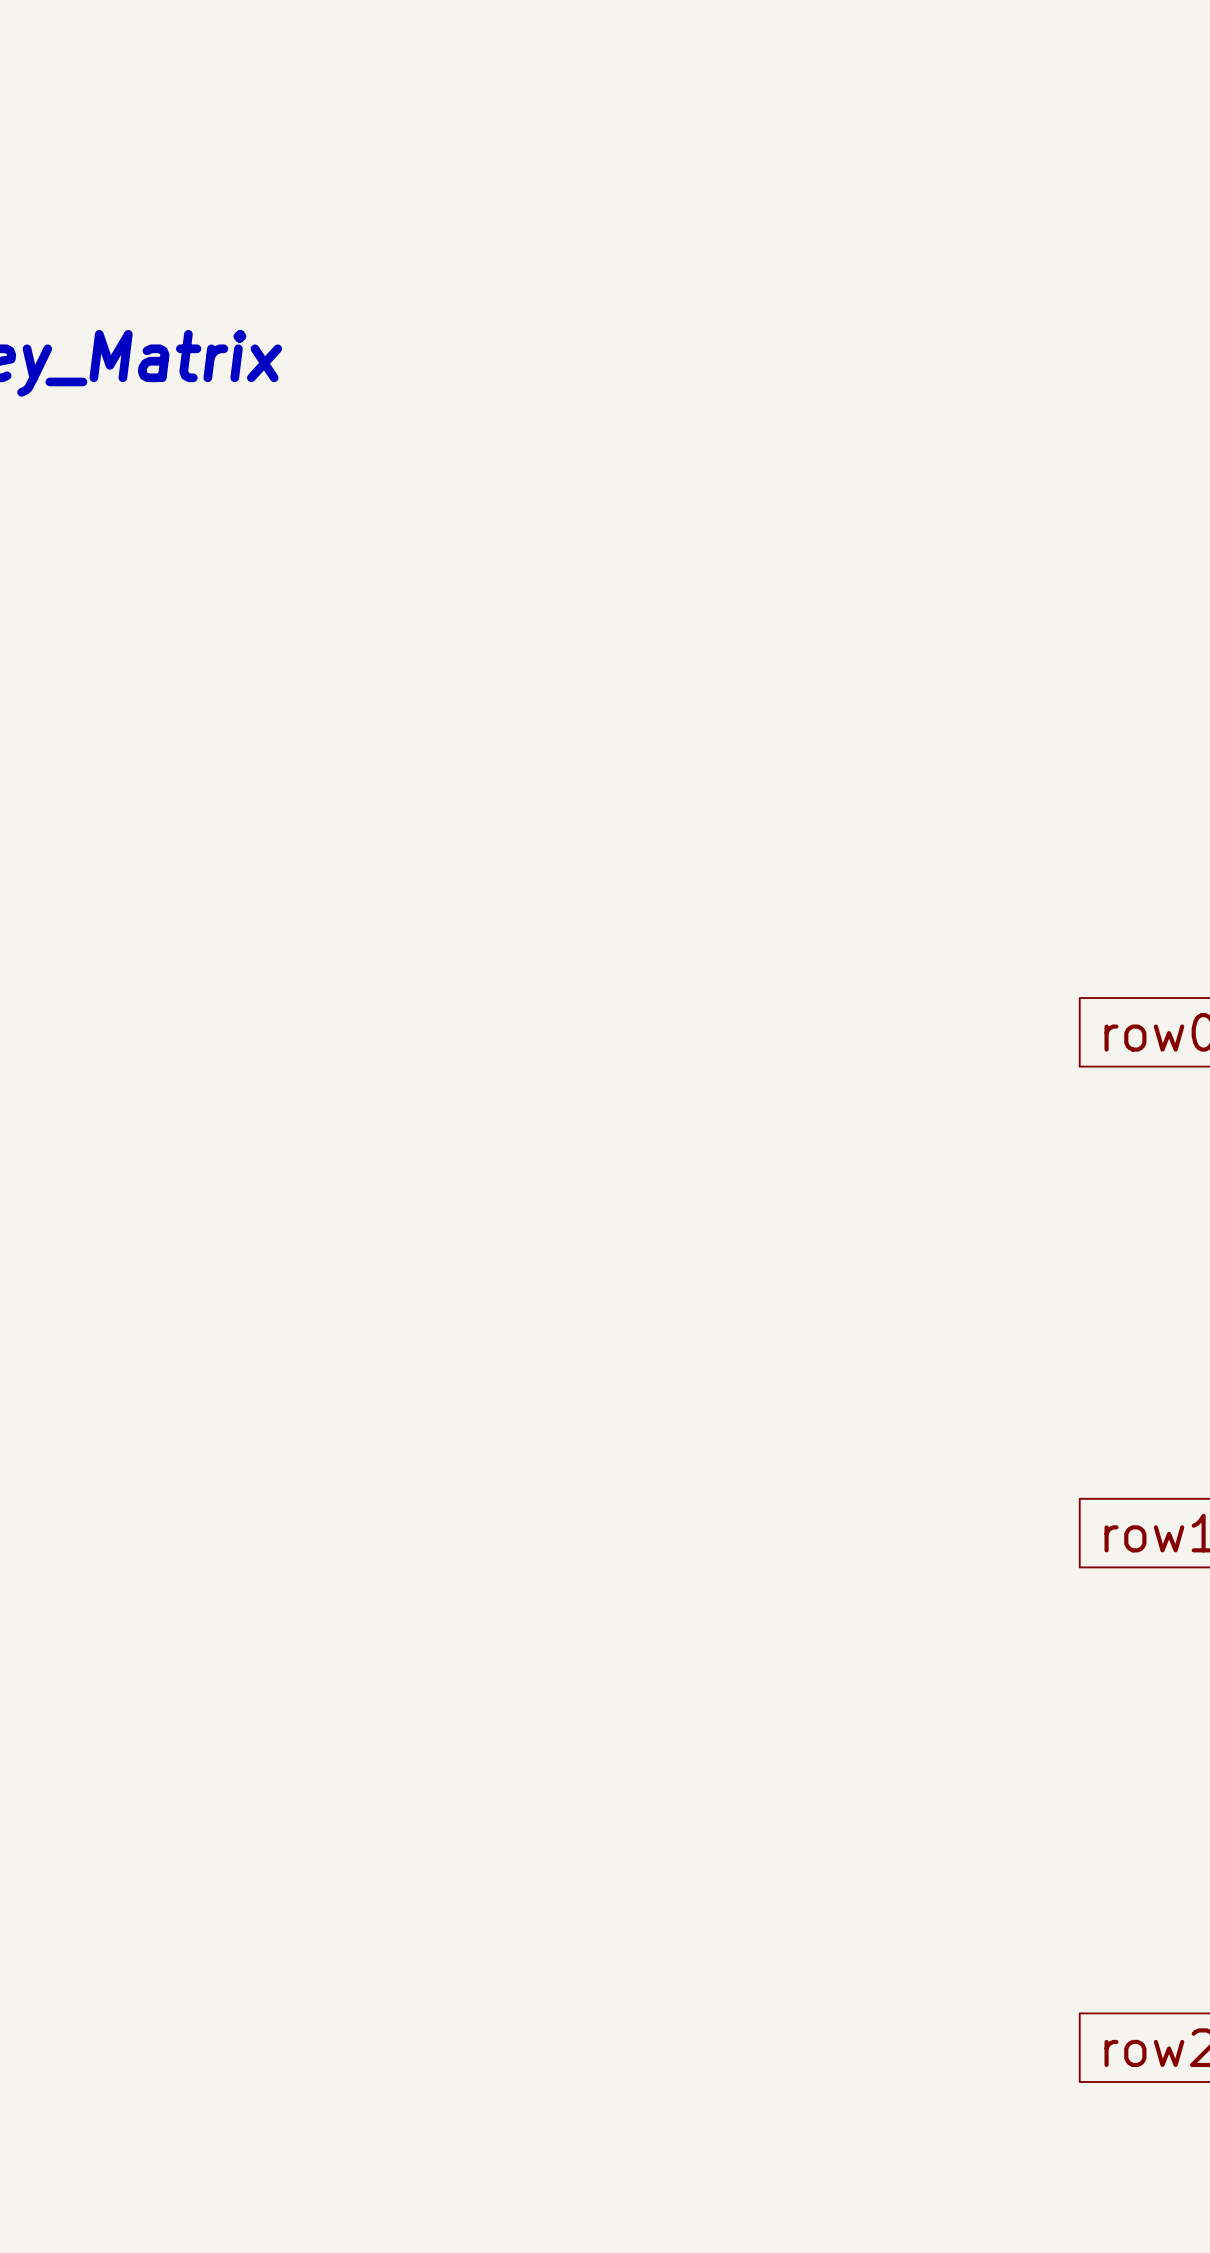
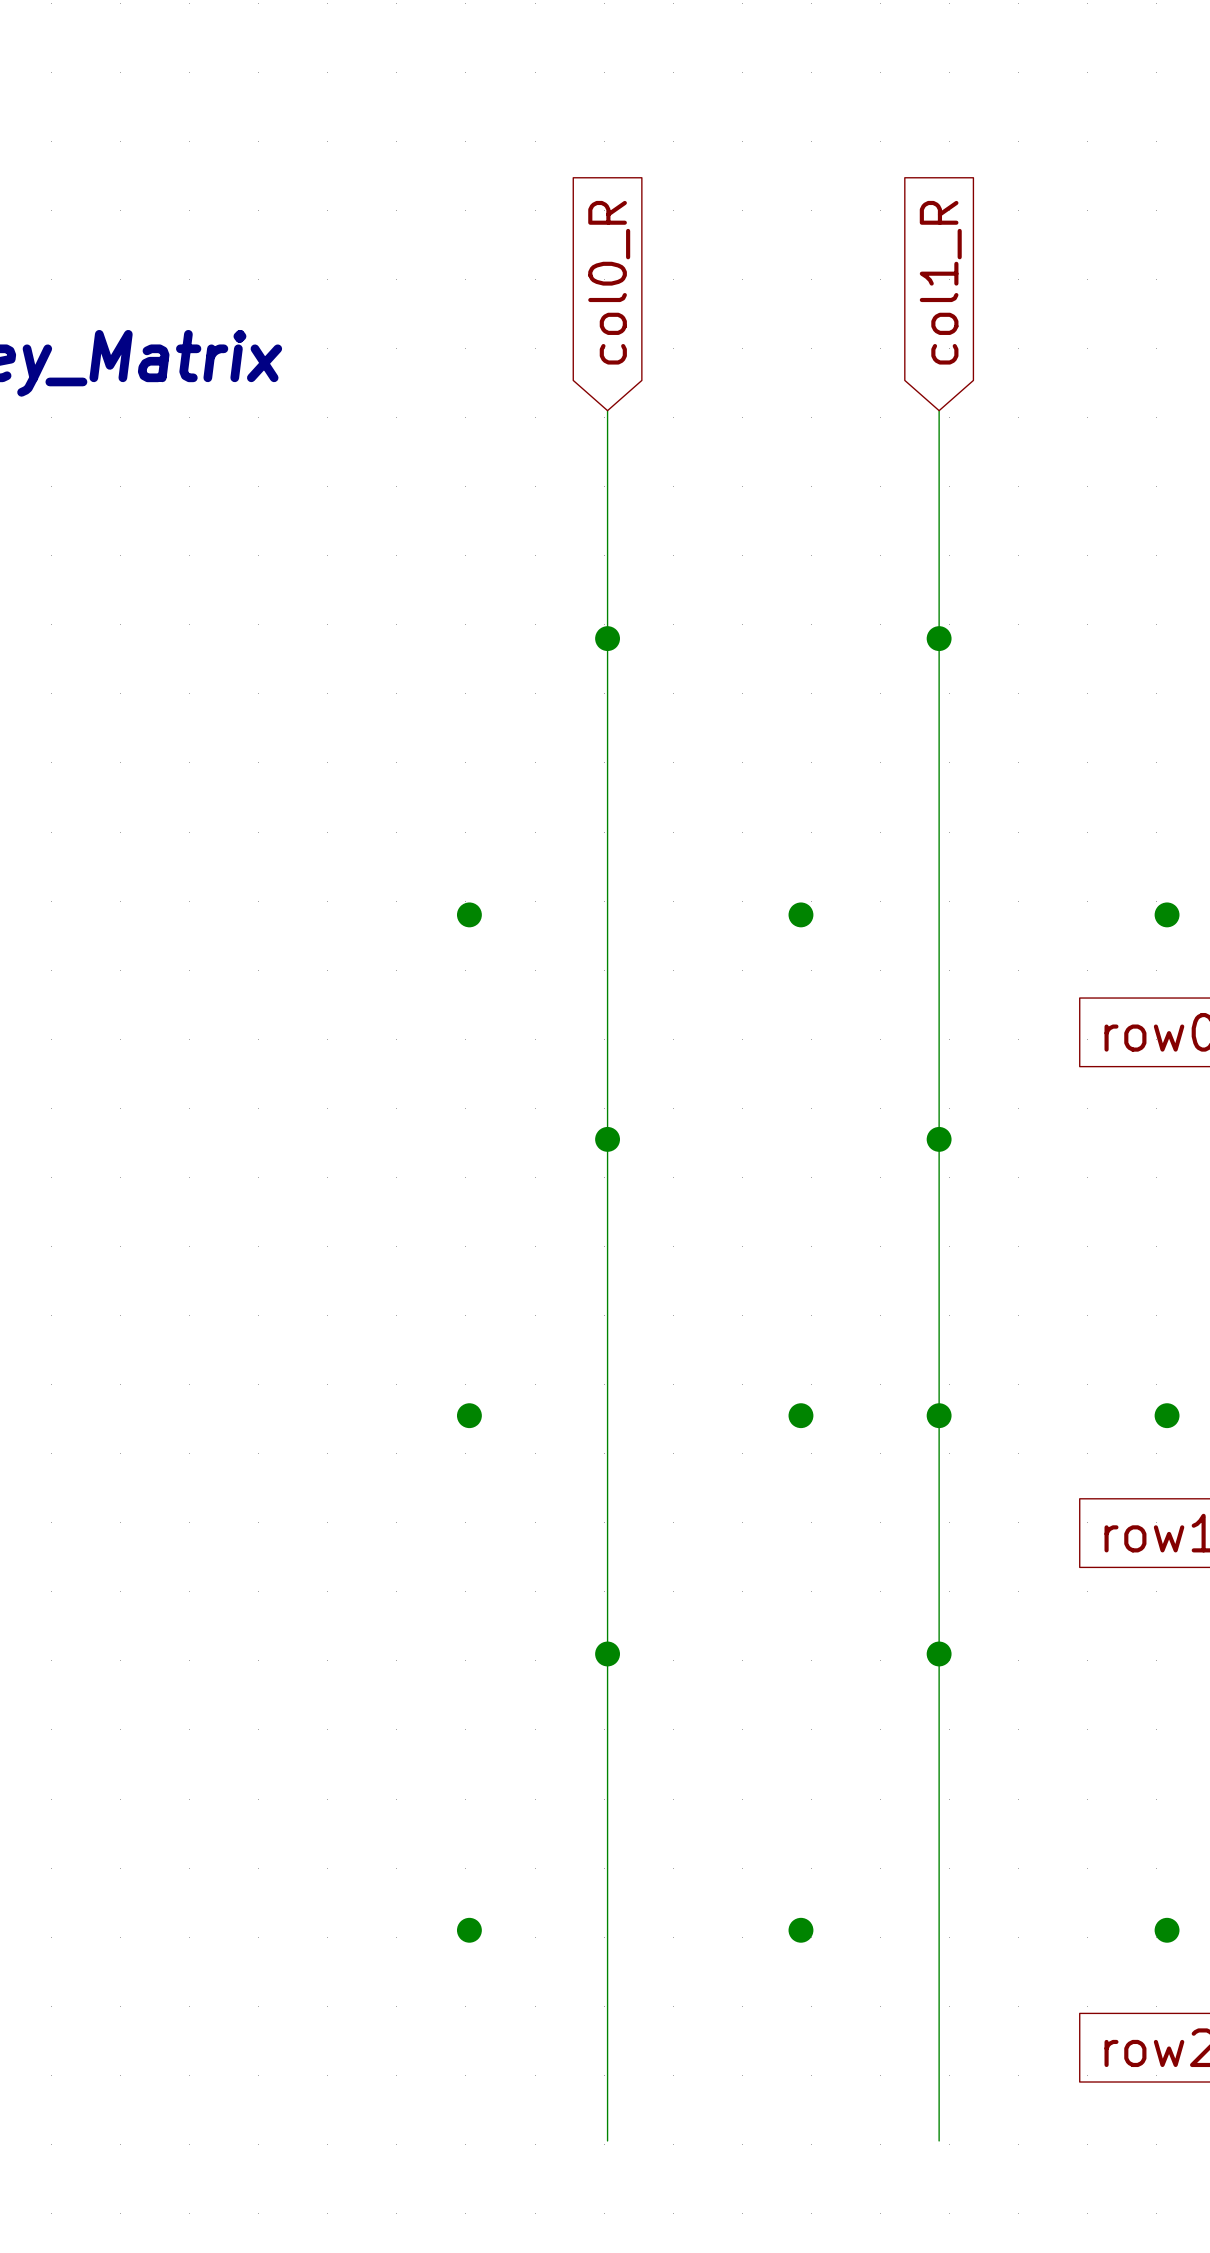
global label: none -> col0_R (609, 282)
global label: none -> col1_R (940, 282)
wire: none -> (607, 410) (607, 2140)
wire: none -> (939, 410) (939, 2140)
junction: none -> (607, 638)
junction: none -> (939, 638)
junction: none -> (469, 914)
junction: none -> (800, 914)
junction: none -> (1167, 914)
junction: none -> (607, 1139)
junction: none -> (939, 1139)
junction: none -> (469, 1415)
junction: none -> (800, 1415)
junction: none -> (939, 1415)
junction: none -> (1167, 1415)
junction: none -> (607, 1653)
junction: none -> (939, 1653)
junction: none -> (469, 1930)
junction: none -> (800, 1930)
junction: none -> (1167, 1930)

